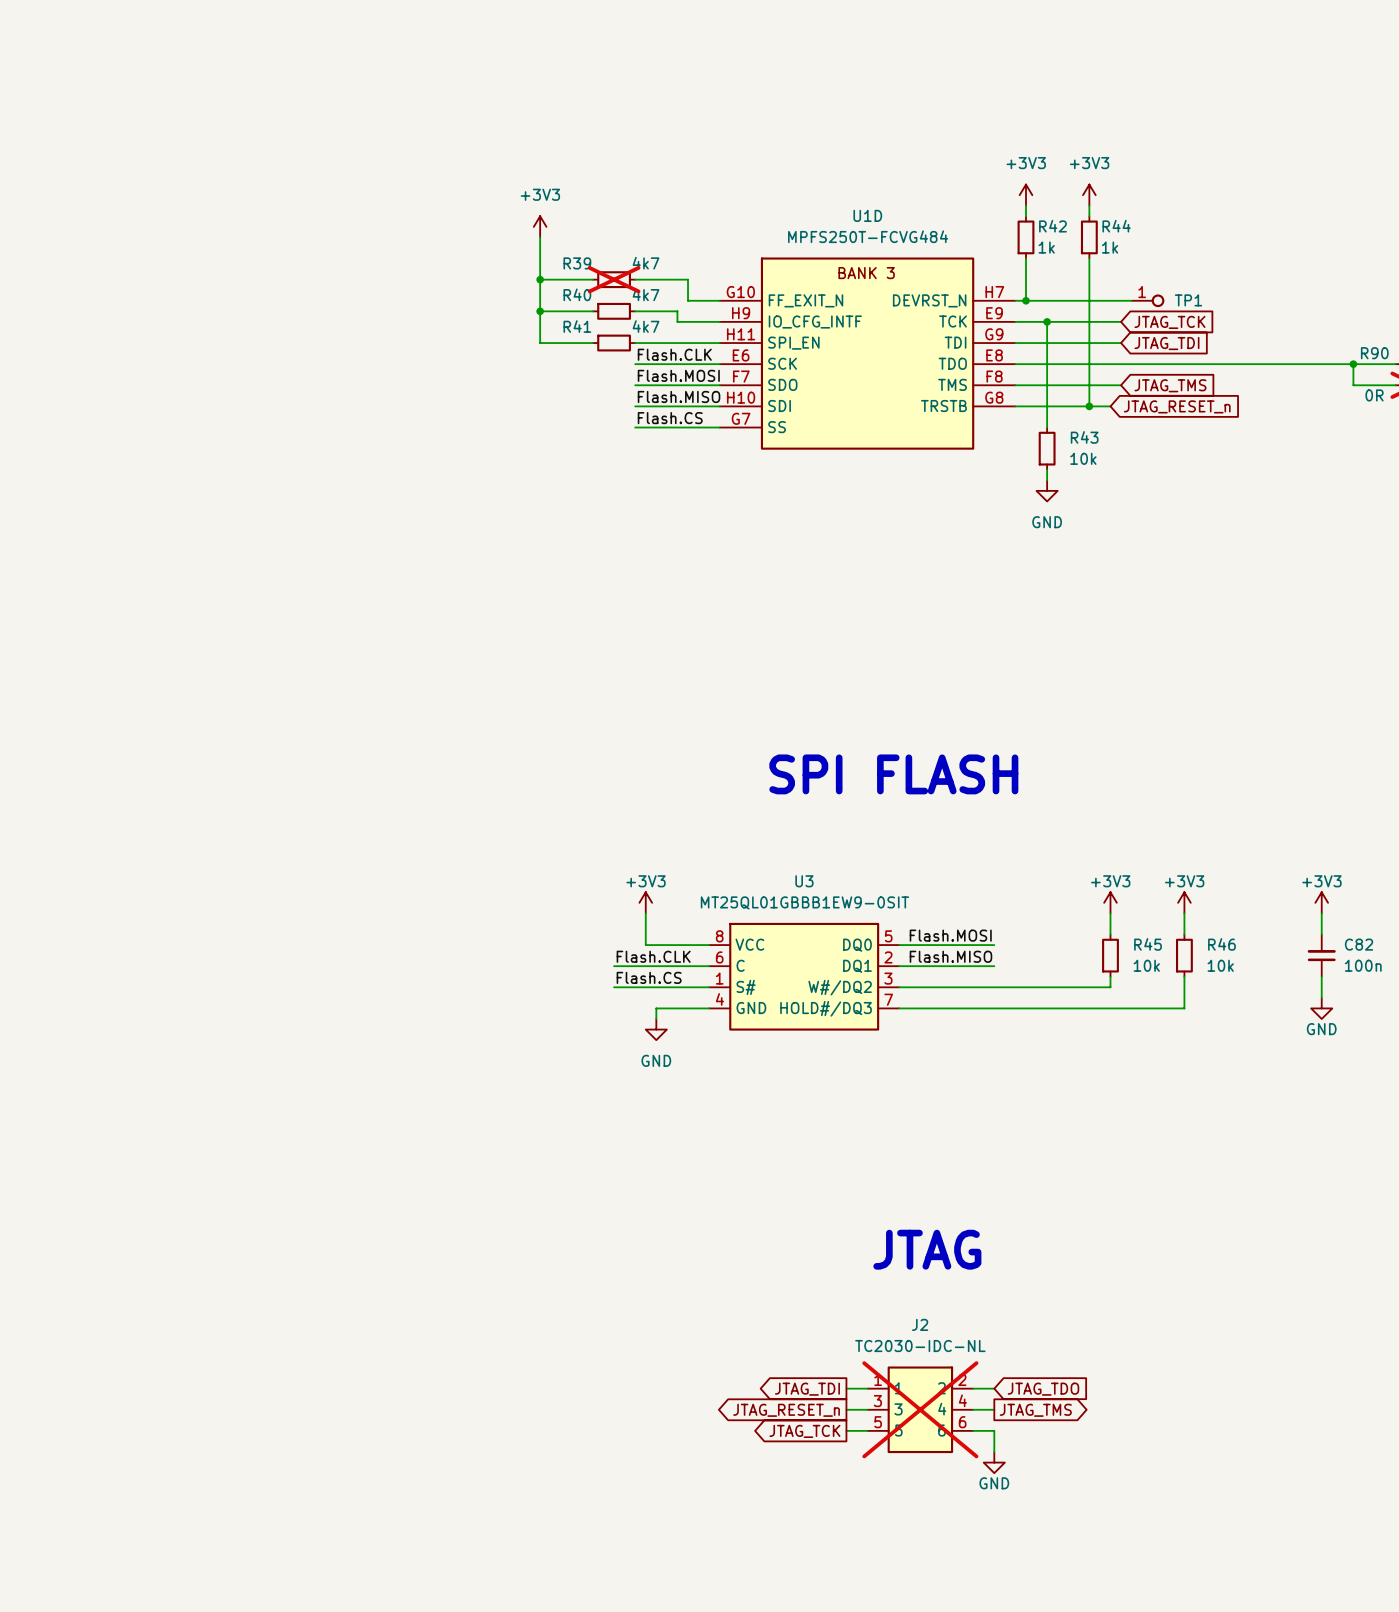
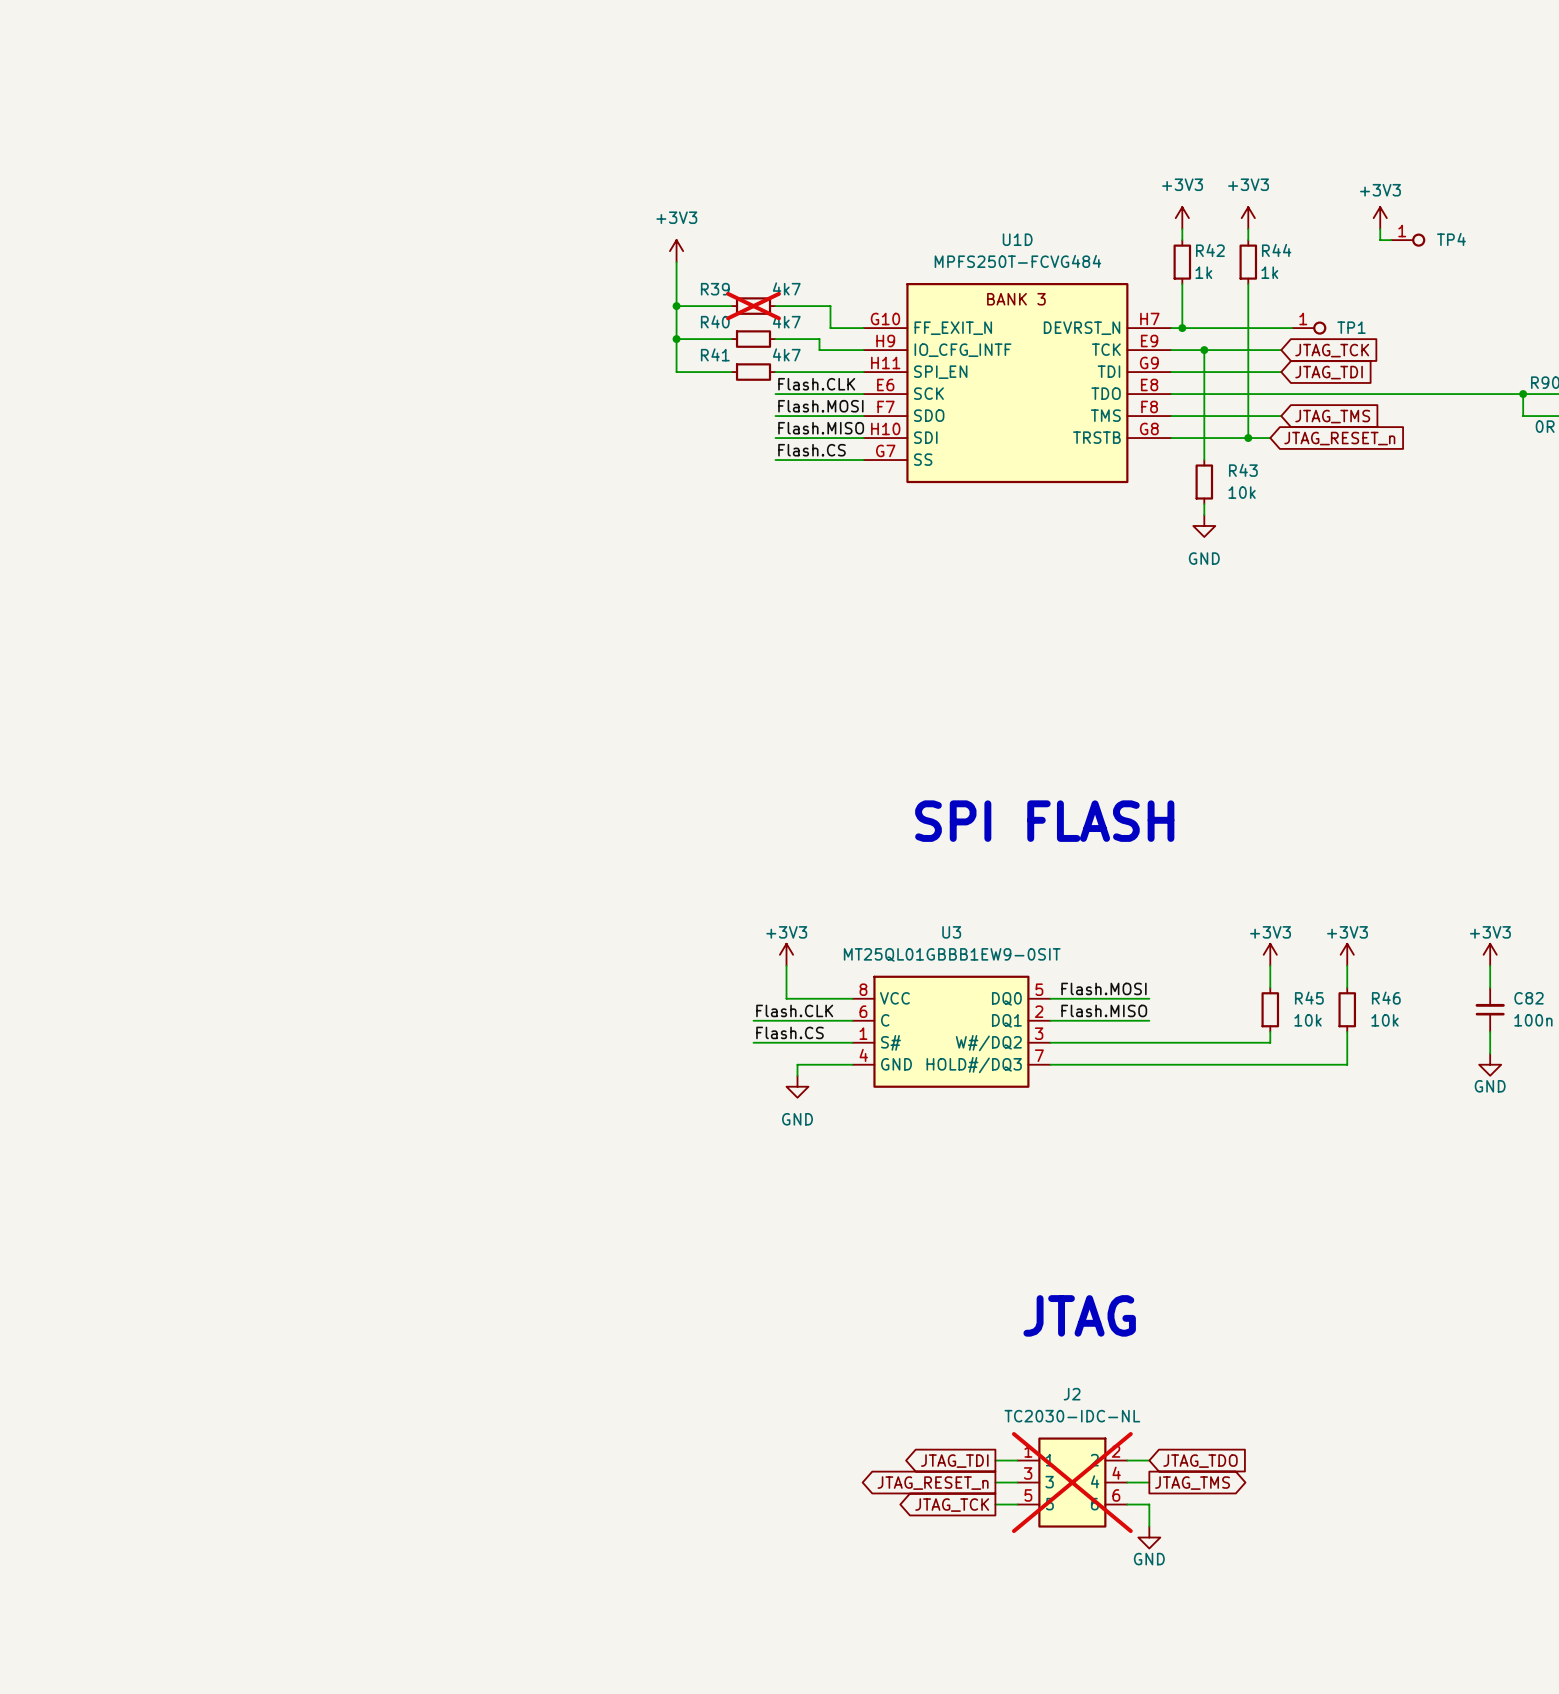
power symbol: none -> +3V3 (1380, 218)
wire: none -> (1380, 229) (1380, 240) (1391, 240)
TP4: none -> (1408, 240)

